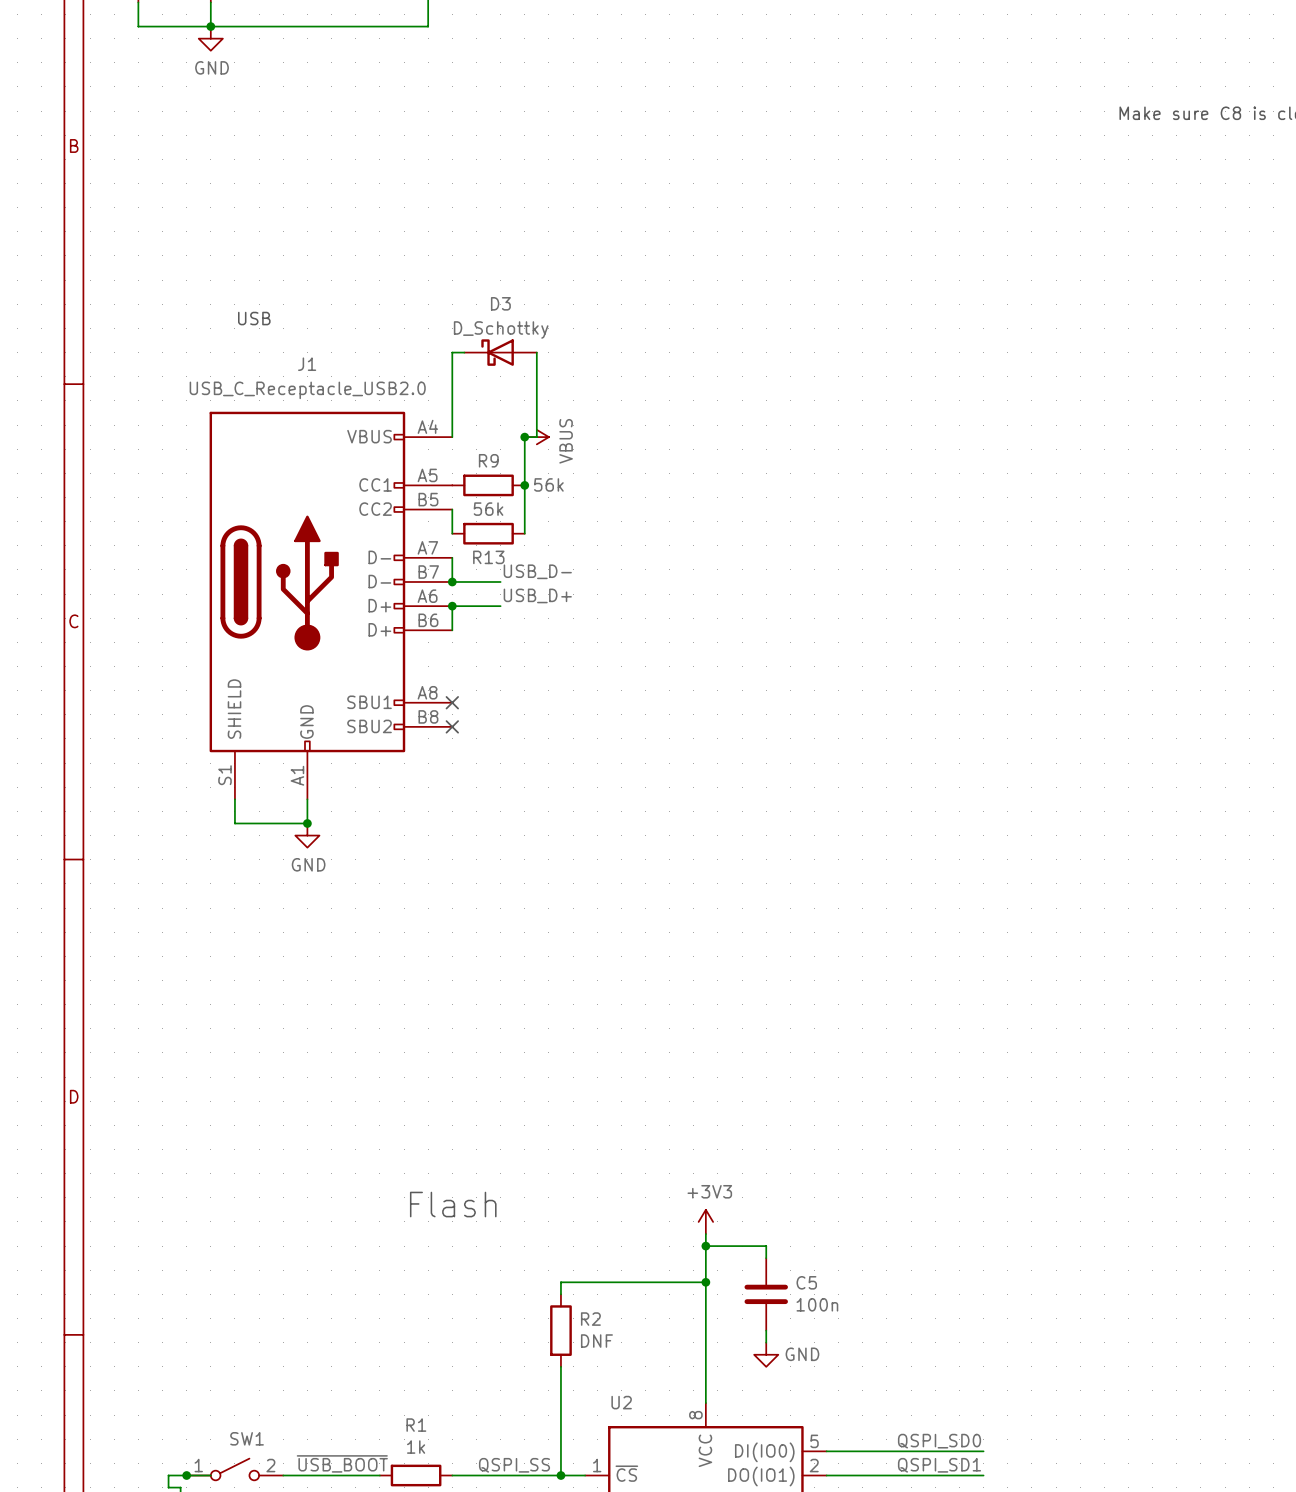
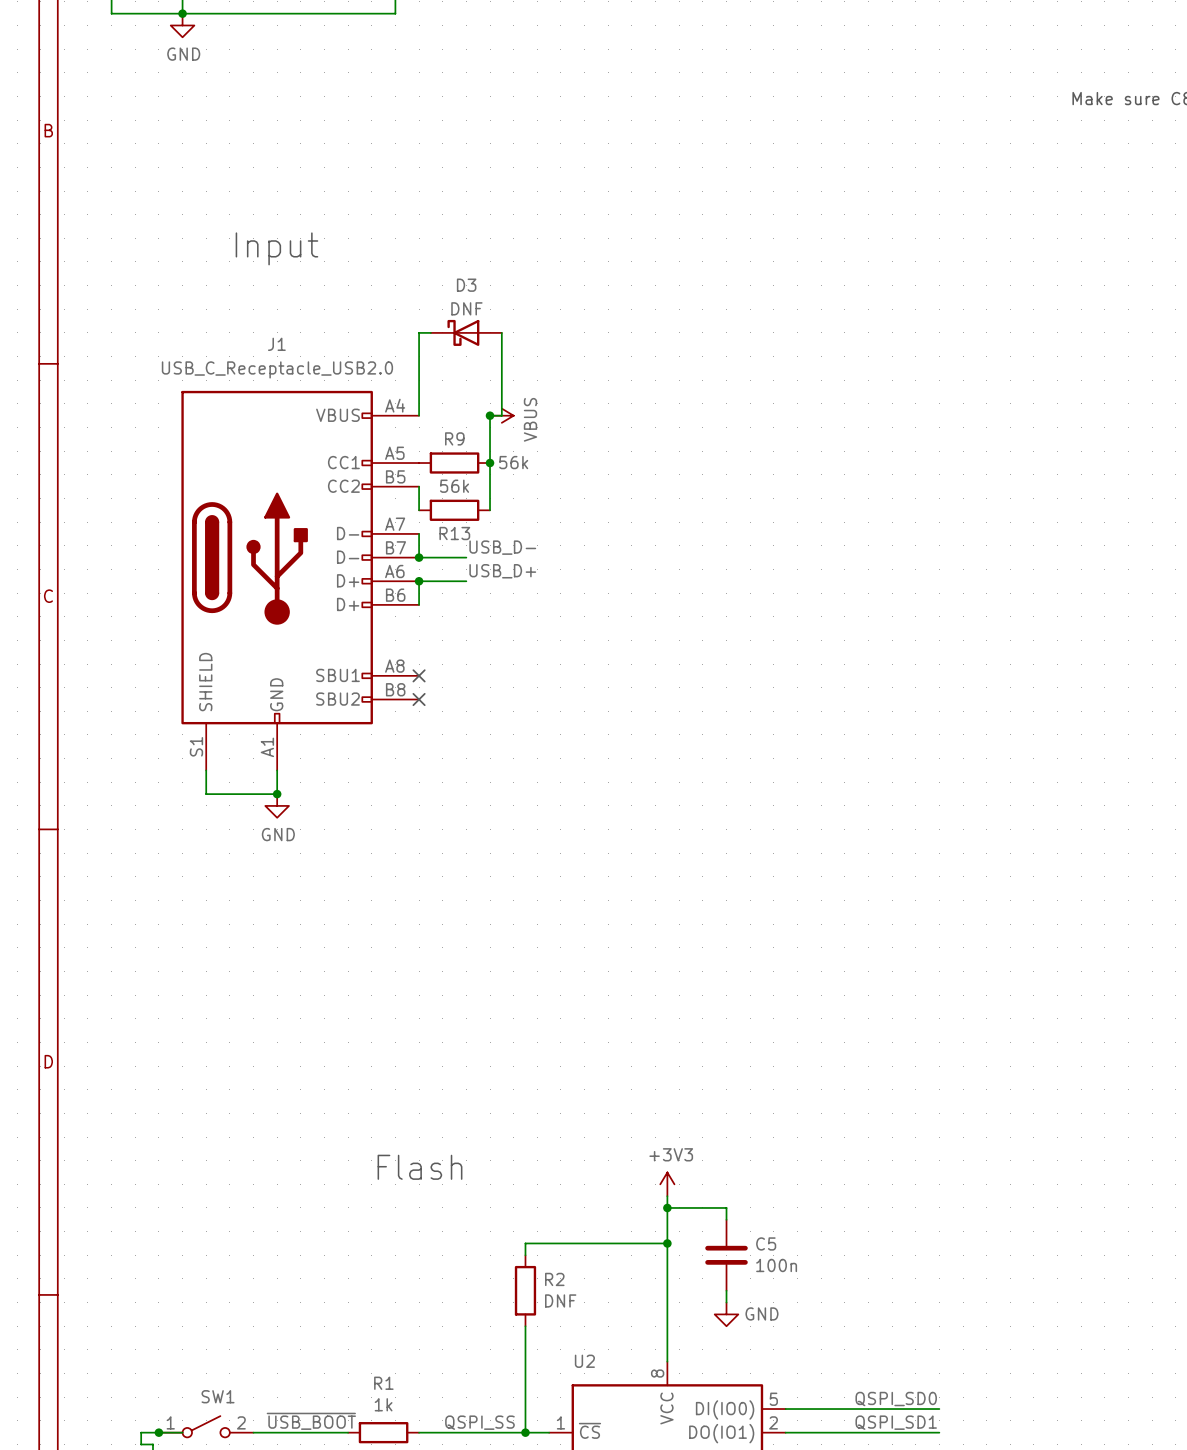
text: none -> Input (276, 248)
text: USB (254, 318) -> none
D3 value: D_Schottky (501, 329) -> DNF (466, 308)

